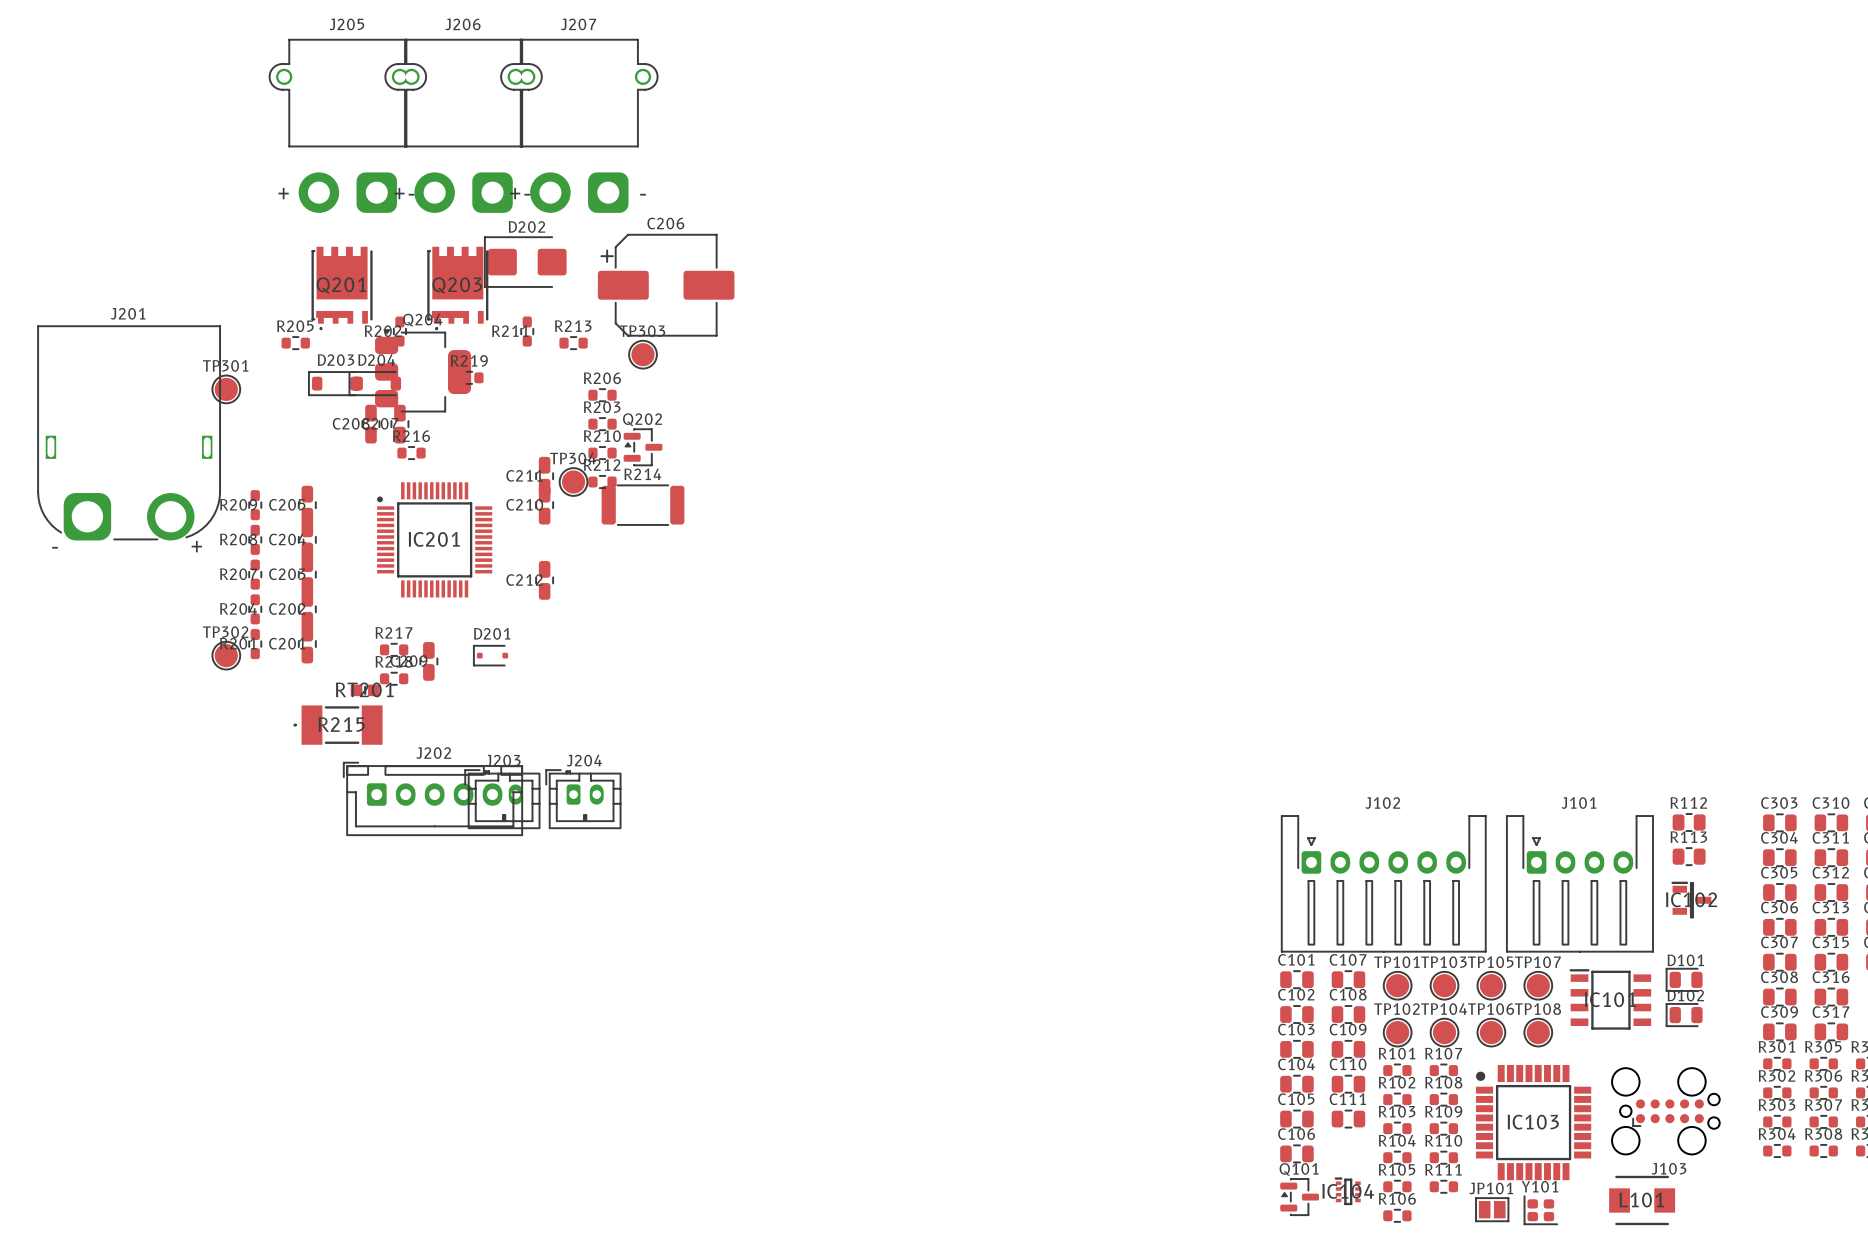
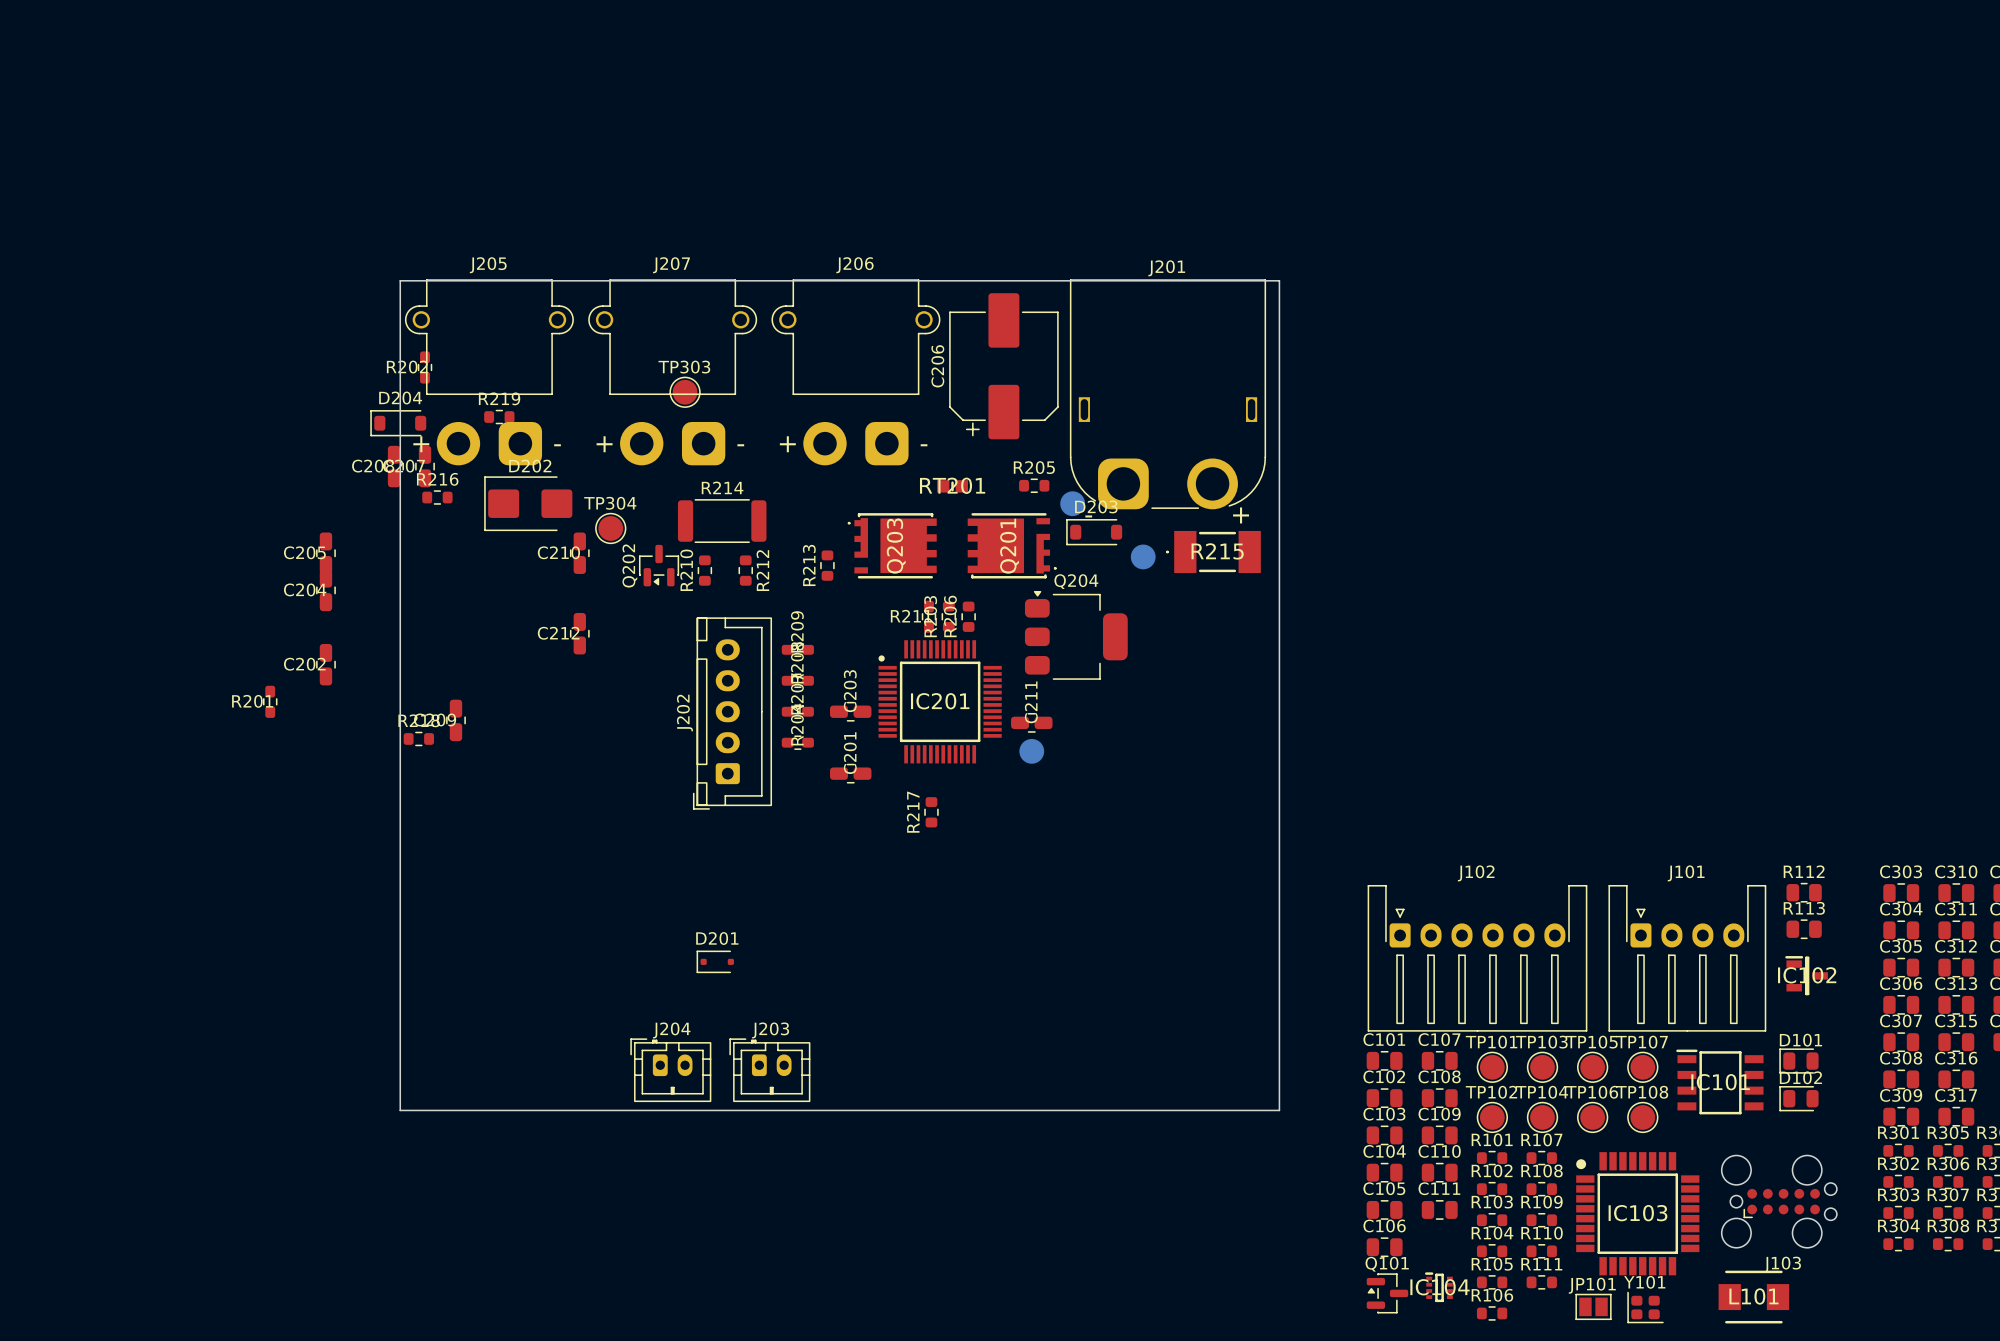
J205 position: (347, 125) -> (489, 372)
J206 position: (463, 125) -> (855, 372)
J207 position: (579, 125) -> (672, 372)
board edge: none -> (400, 280) (1279, 280) (1279, 1110) (400, 1110) (400, 280)
D202 position: (525, 262) -> (528, 503)
C206 rotation: 0° (666, 285) -> 90° counterclockwise (1003, 366)
C206 position: (666, 285) -> (1003, 366)
Q201 rotation: 0° (342, 288) -> 90° counterclockwise (1012, 545)
Q201 position: (342, 288) -> (1012, 545)
Q203 rotation: 0° (457, 288) -> 90° clockwise (892, 545)
Q203 position: (457, 288) -> (892, 545)
R213 name position: R213 (573, 326) -> R213 (809, 565)
R211 position: (527, 331) -> (929, 616)
R205 position: (295, 343) -> (1034, 485)
R213 rotation: 0° (573, 343) -> 90° clockwise (827, 565)
R213 position: (573, 343) -> (827, 565)
Q204 position: (423, 370) -> (1076, 635)
R206 name position: R206 (602, 378) -> R206 (950, 616)
D203 position: (334, 383) -> (1094, 532)
TP301: (226, 389) -> none
R206 rotation: 0° (602, 395) -> 90° clockwise (968, 616)
R206 position: (602, 395) -> (968, 616)
R203 name position: R203 (602, 407) -> R203 (930, 616)
R203 rotation: 0° (602, 424) -> 90° clockwise (948, 616)
R203 position: (602, 424) -> (948, 616)
J201 position: (129, 432) -> (1167, 394)
R210 name position: R210 (602, 436) -> R210 (686, 570)
Q202 rotation: 0° (643, 447) -> 90° counterclockwise (659, 565)
Q202 position: (643, 447) -> (659, 565)
R210 rotation: 0° (602, 453) -> 90° clockwise (704, 570)
R210 position: (602, 453) -> (704, 570)
part: none -> (1072, 503)
C211 rotation: 0° (544, 476) -> 90° clockwise (1031, 722)
C211 position: (544, 476) -> (1031, 722)
R212 rotation: 0° (602, 482) -> 90° clockwise (745, 570)
R212 position: (602, 482) -> (745, 570)
R209 rotation: 0° (255, 505) -> 90° clockwise (797, 649)
R209 position: (255, 505) -> (797, 649)
R214 position: (643, 505) -> (722, 521)
part: none -> (1143, 556)
R208 rotation: 0° (255, 539) -> 90° clockwise (797, 680)
R208 position: (255, 539) -> (797, 680)
IC201 position: (434, 539) -> (940, 701)
R207 rotation: 0° (255, 574) -> 90° clockwise (797, 711)
R207 position: (255, 574) -> (797, 711)
C203 rotation: 0° (307, 574) -> 90° clockwise (850, 711)
C203 position: (307, 574) -> (850, 711)
R204 rotation: 0° (255, 609) -> 90° clockwise (797, 742)
R204 position: (255, 609) -> (797, 742)
R217 name position: R217 (393, 632) -> R217 (913, 812)
C201 rotation: 0° (307, 644) -> 90° clockwise (850, 773)
C201 position: (307, 644) -> (850, 773)
R217 rotation: 0° (394, 649) -> 90° clockwise (931, 812)
R217 position: (394, 649) -> (931, 812)
TP302: (226, 655) -> none
D201 position: (490, 655) -> (715, 961)
RT201 position: (365, 690) -> (952, 486)
part: none -> (1031, 751)
R215 position: (338, 725) -> (1213, 551)
J202 rotation: 0° (432, 798) -> 90° counterclockwise (732, 713)
J202 position: (432, 798) -> (732, 713)
J203 position: (502, 799) -> (769, 1070)
J204 position: (583, 799) -> (670, 1070)

